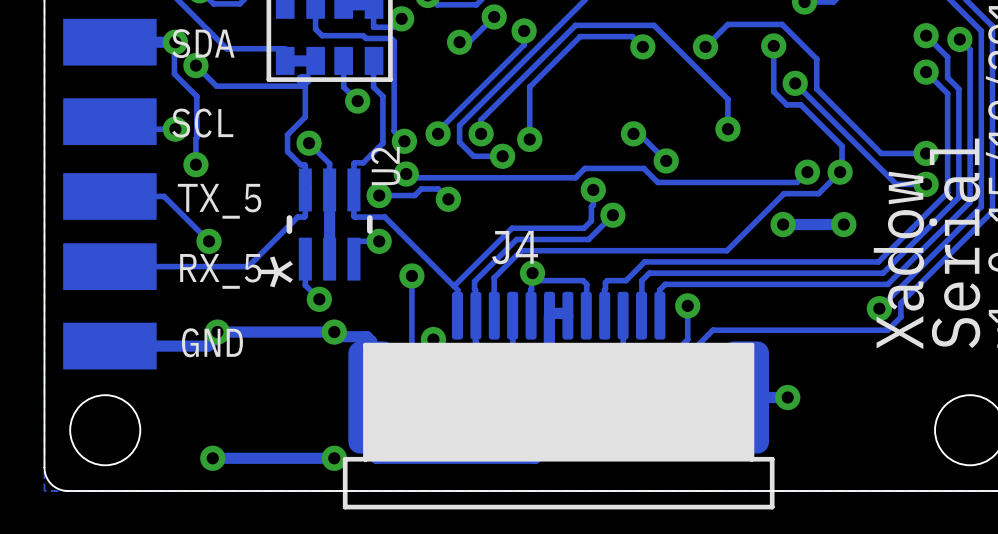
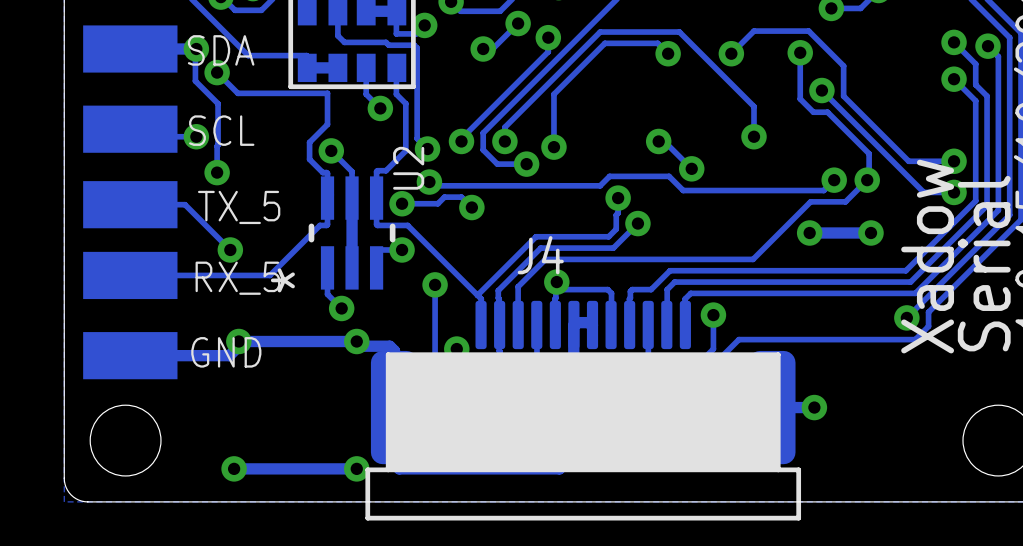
track: (306, 79) (301, 79) -> none

